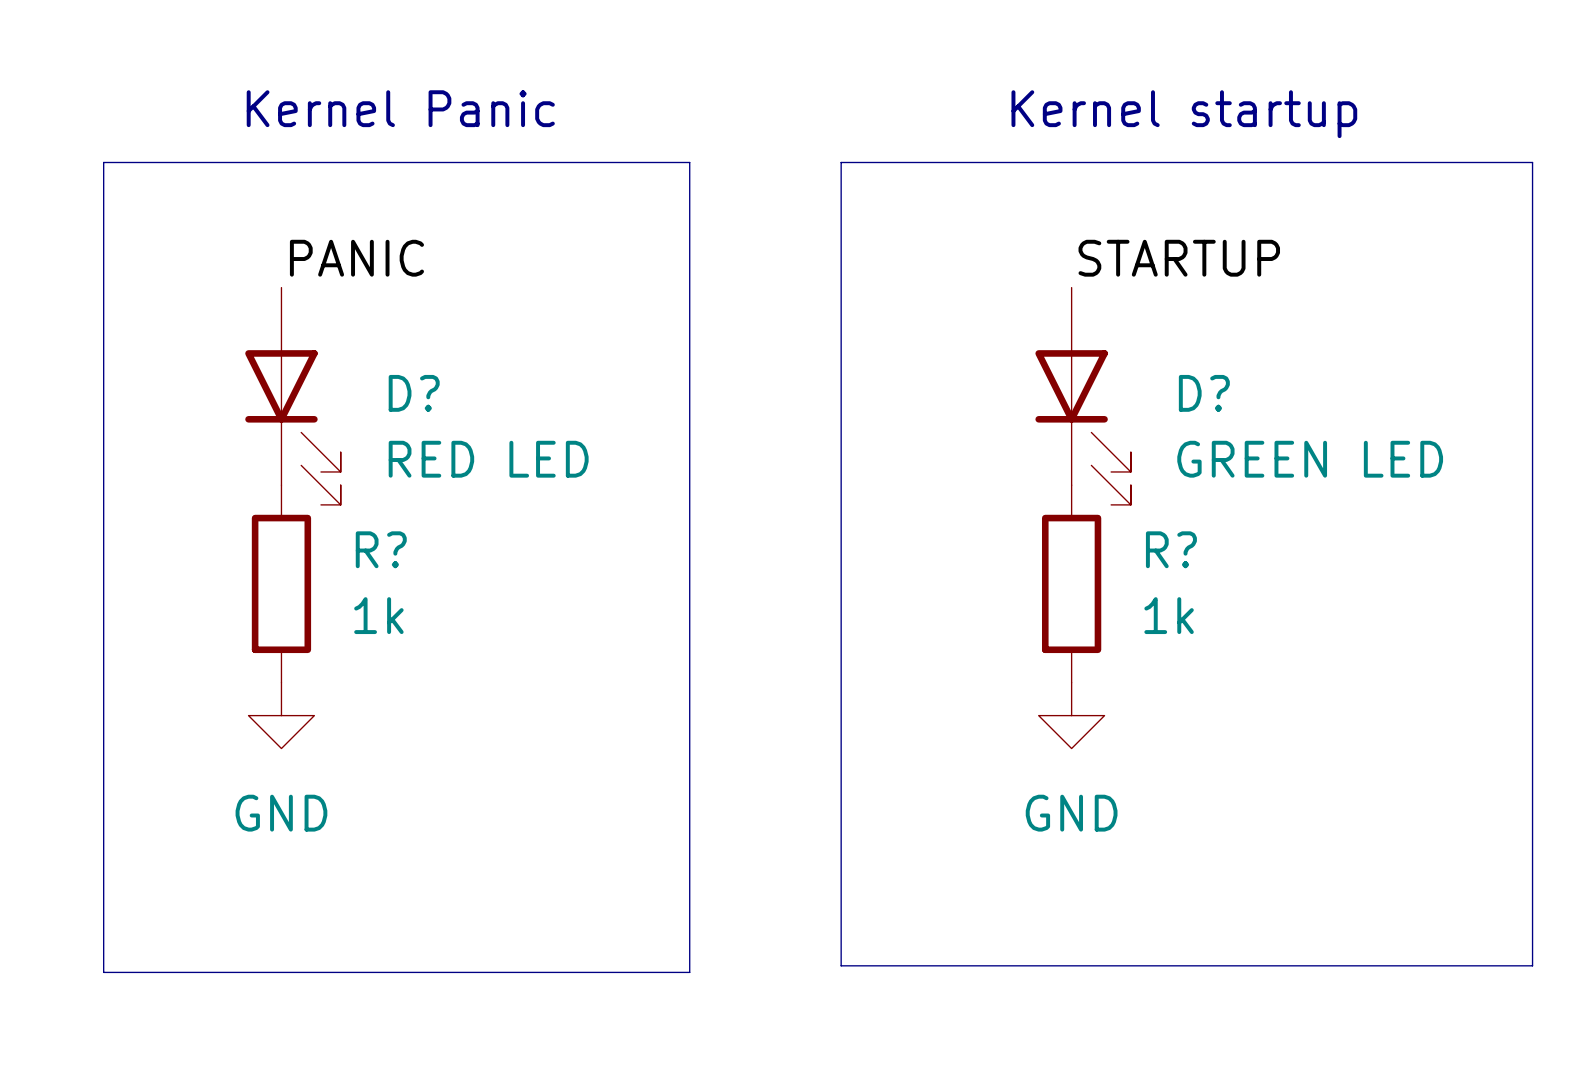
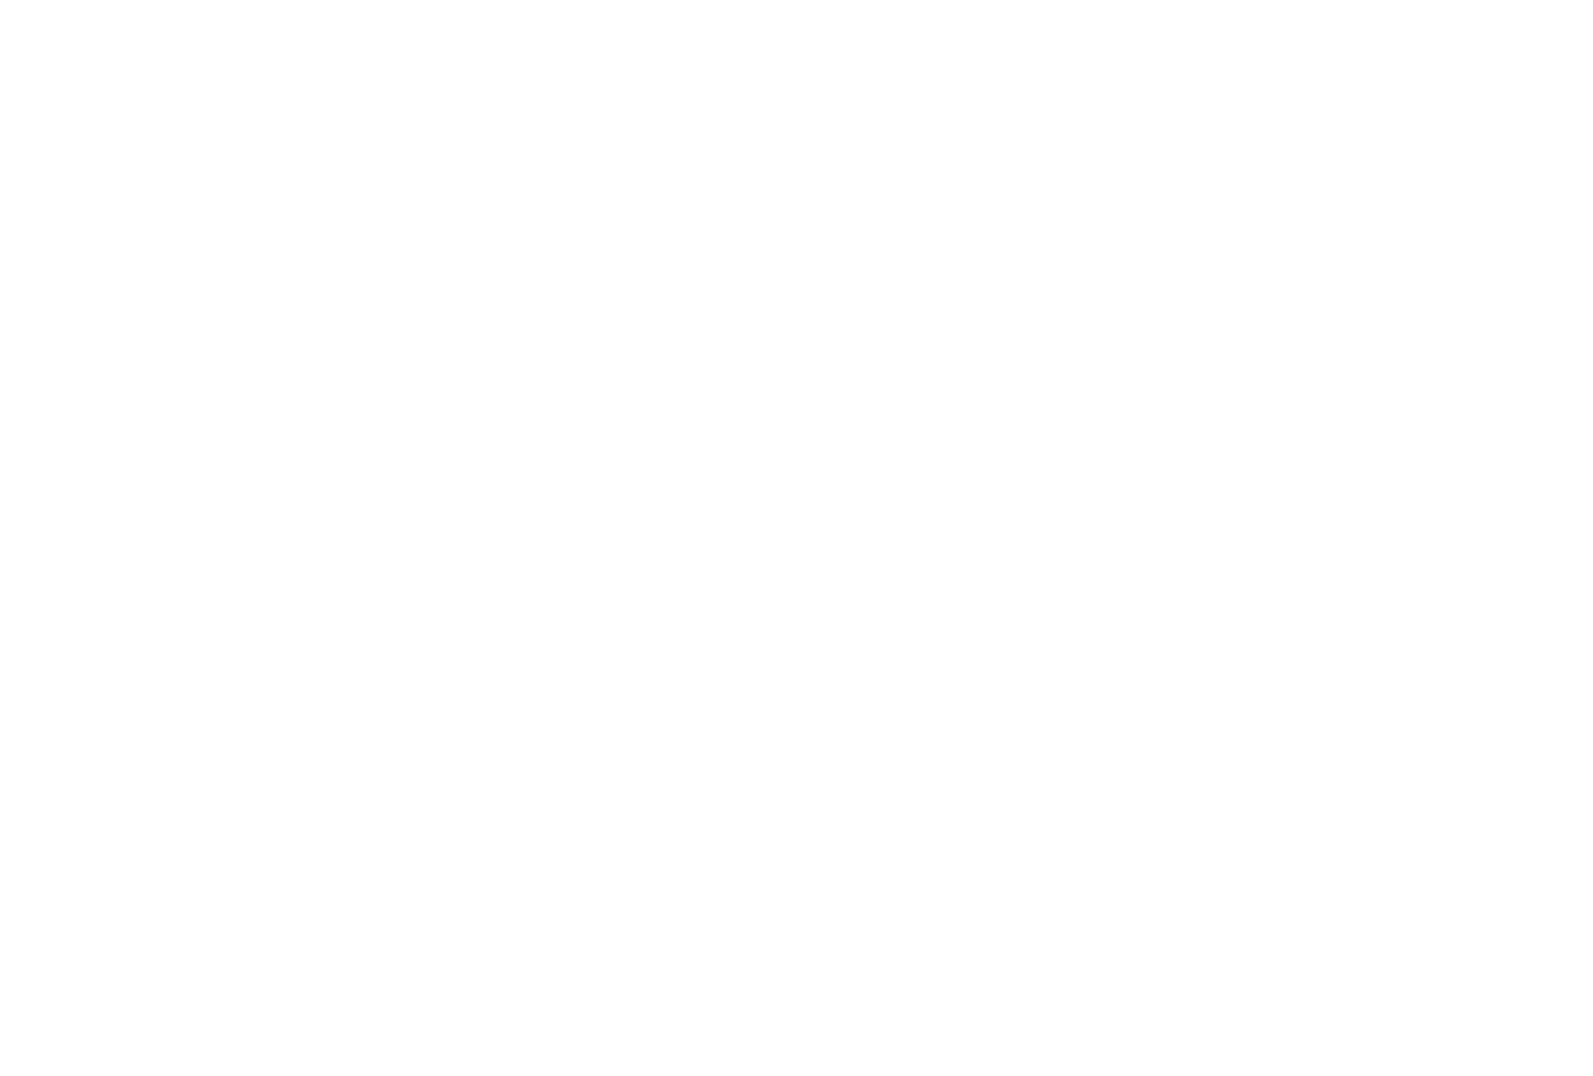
text: Kernel Panic (400, 108) -> none
text: Kernel startup (1184, 114) -> none
line: (103, 162) (689, 162) (689, 972) (103, 972) (103, 162) -> none
line: (841, 162) (1532, 162) (1532, 965) (841, 965) (841, 162) -> none
label: PANIC (356, 258) -> none
label: STARTUP (1179, 258) -> none
D?: RED LED (292, 396) -> none
D?: GREEN LED (1083, 396) -> none
R?: 1k (281, 583) -> none
R?: 1k (1071, 583) -> none
power symbol: GND (281, 715) -> none
power symbol: GND (1071, 715) -> none

